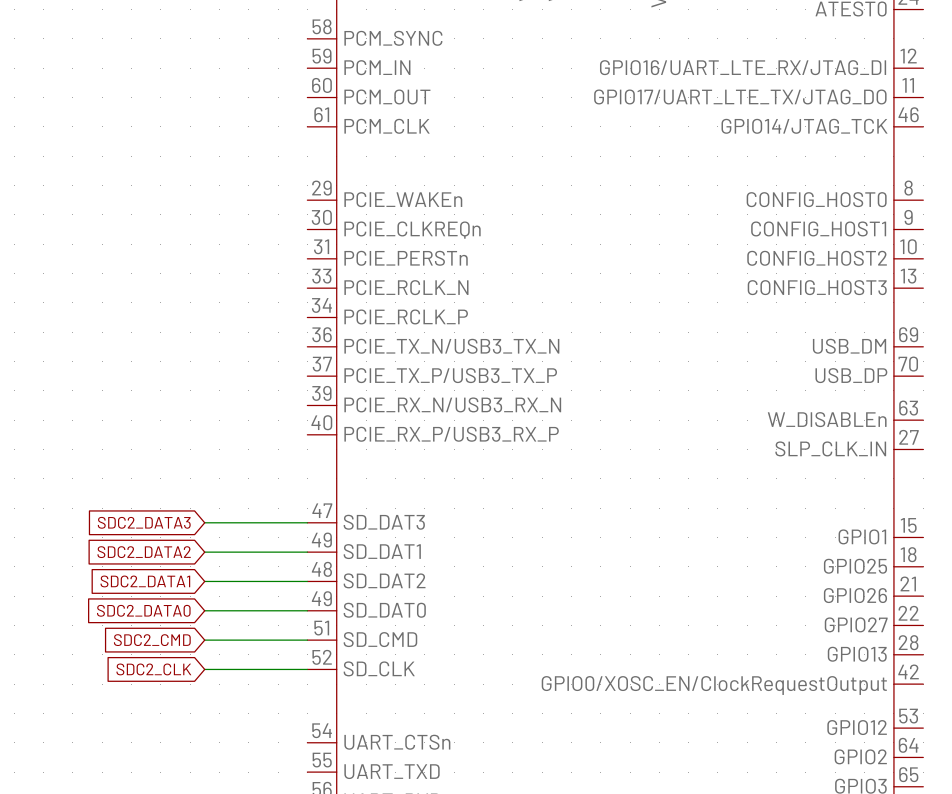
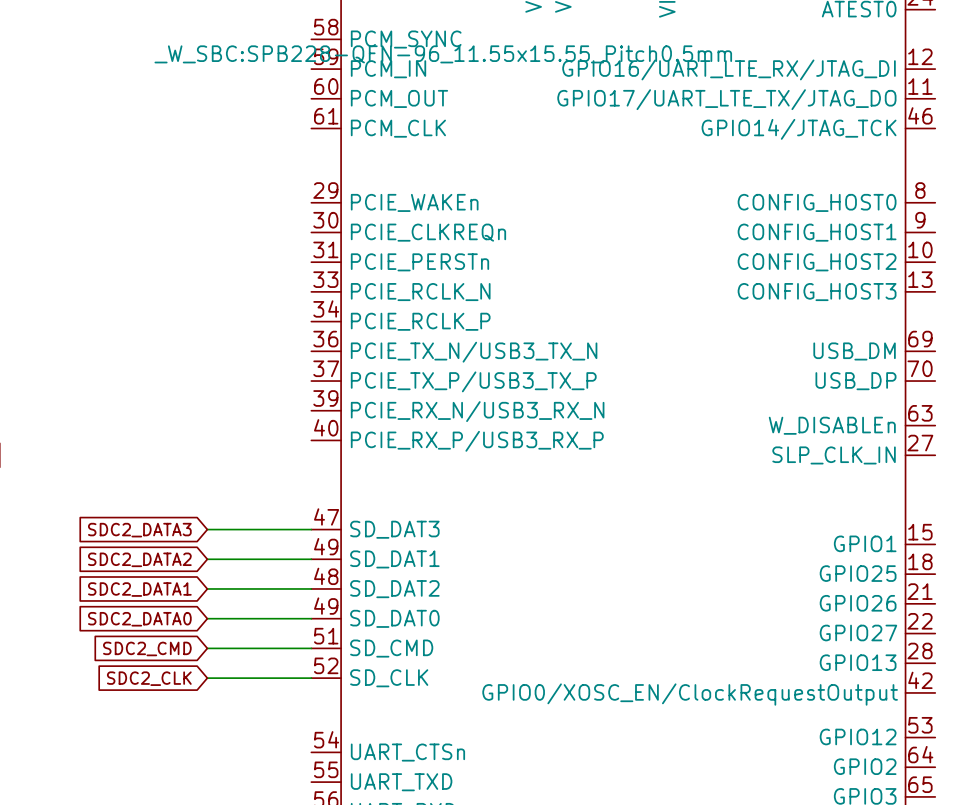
part text: none -> _W_SBC:SPB228-QFN-96_11.55x15.55_Pitch0.5mm (443, 54)

